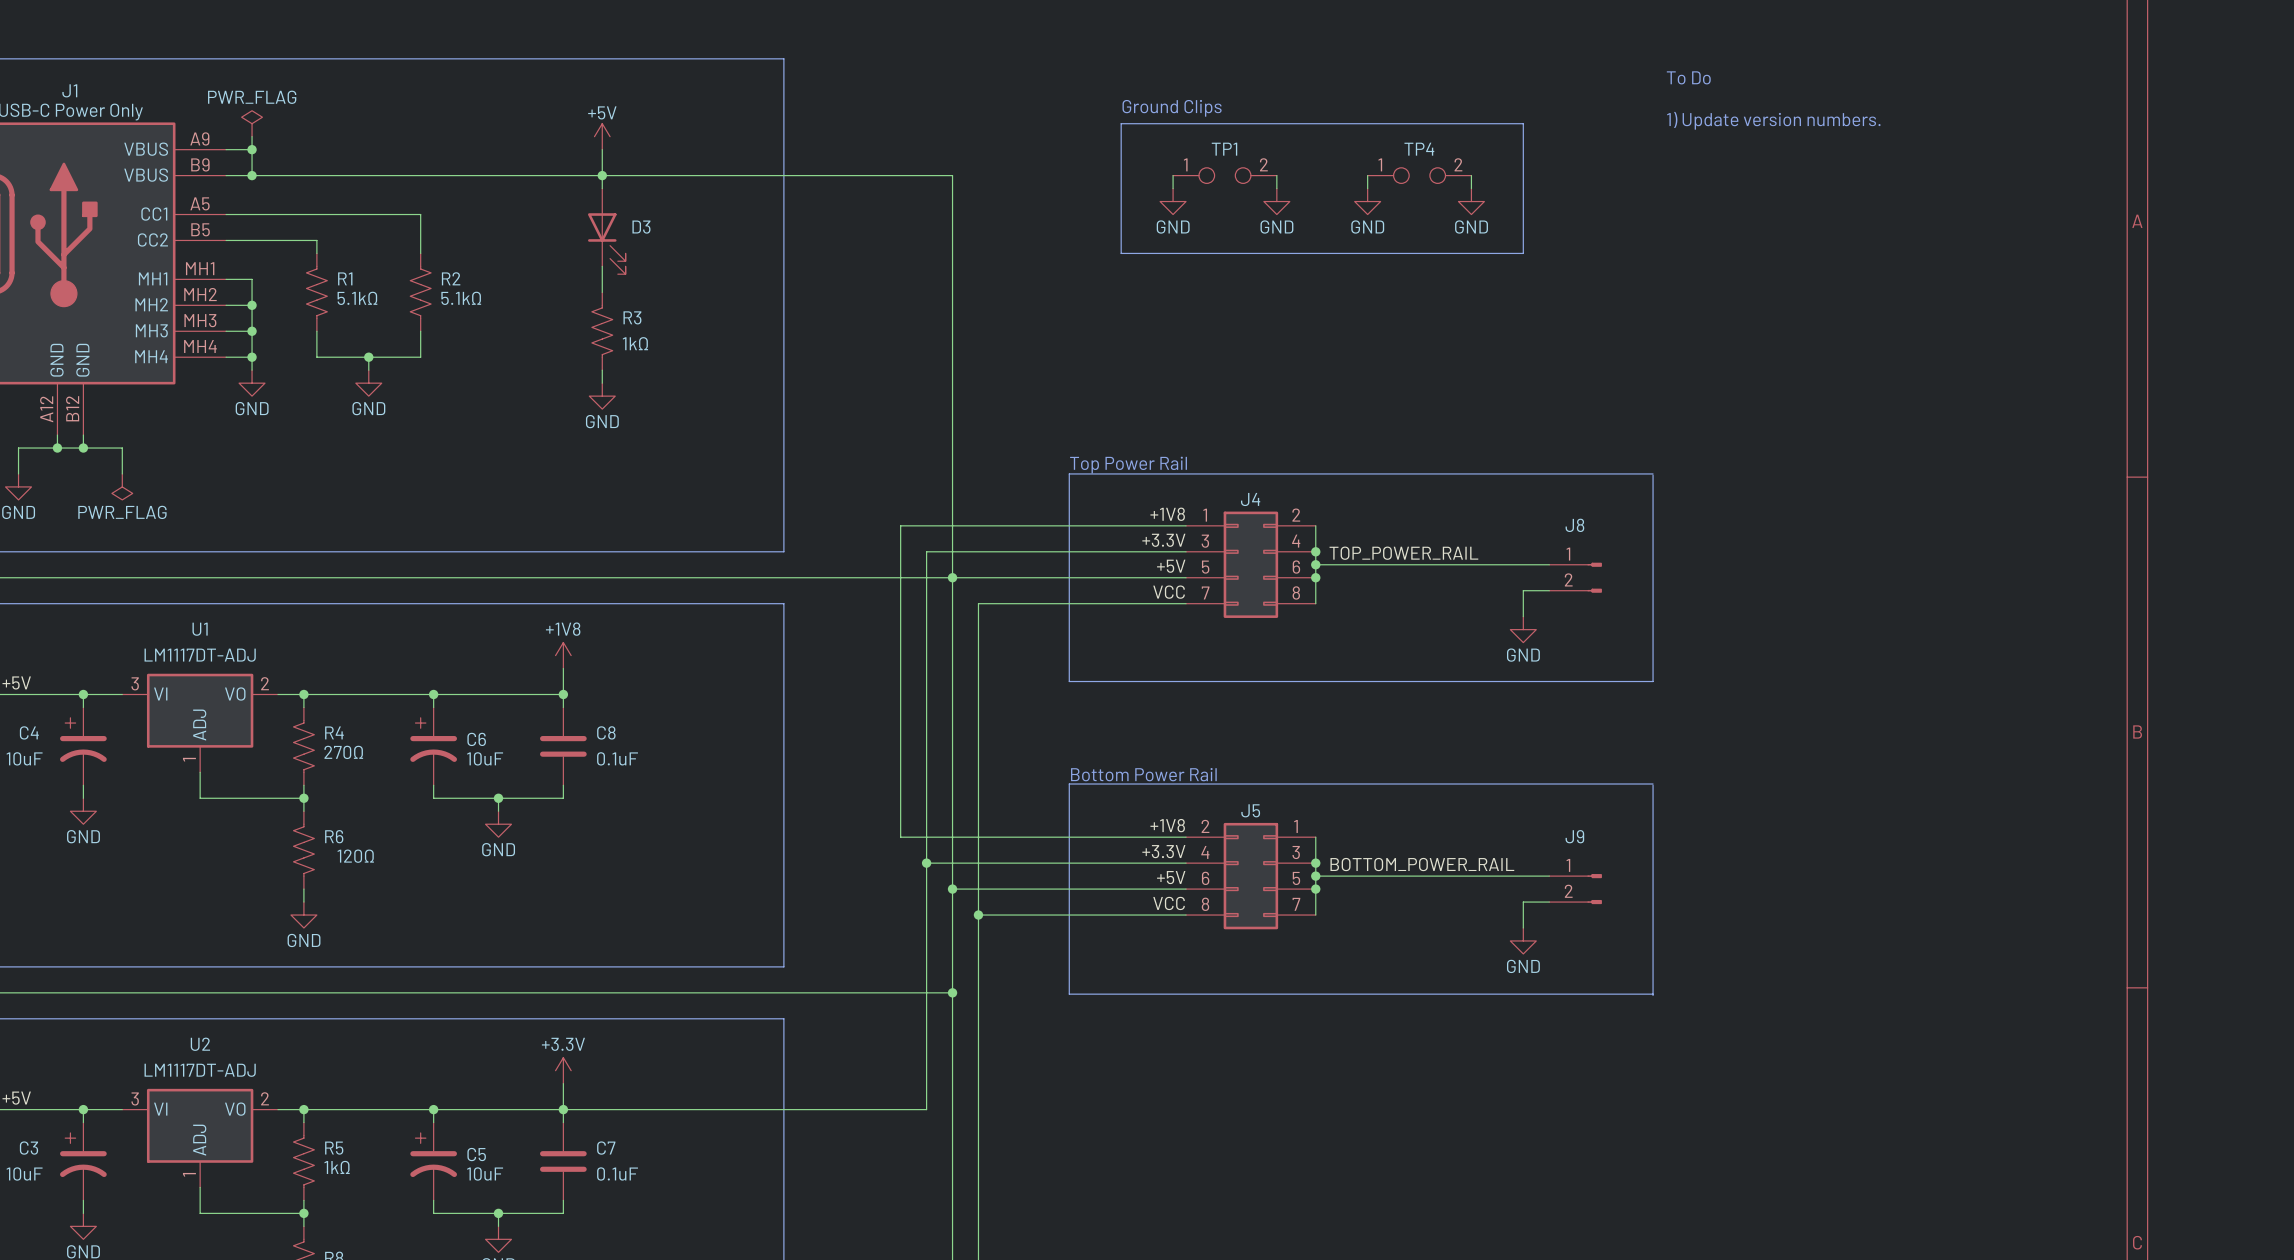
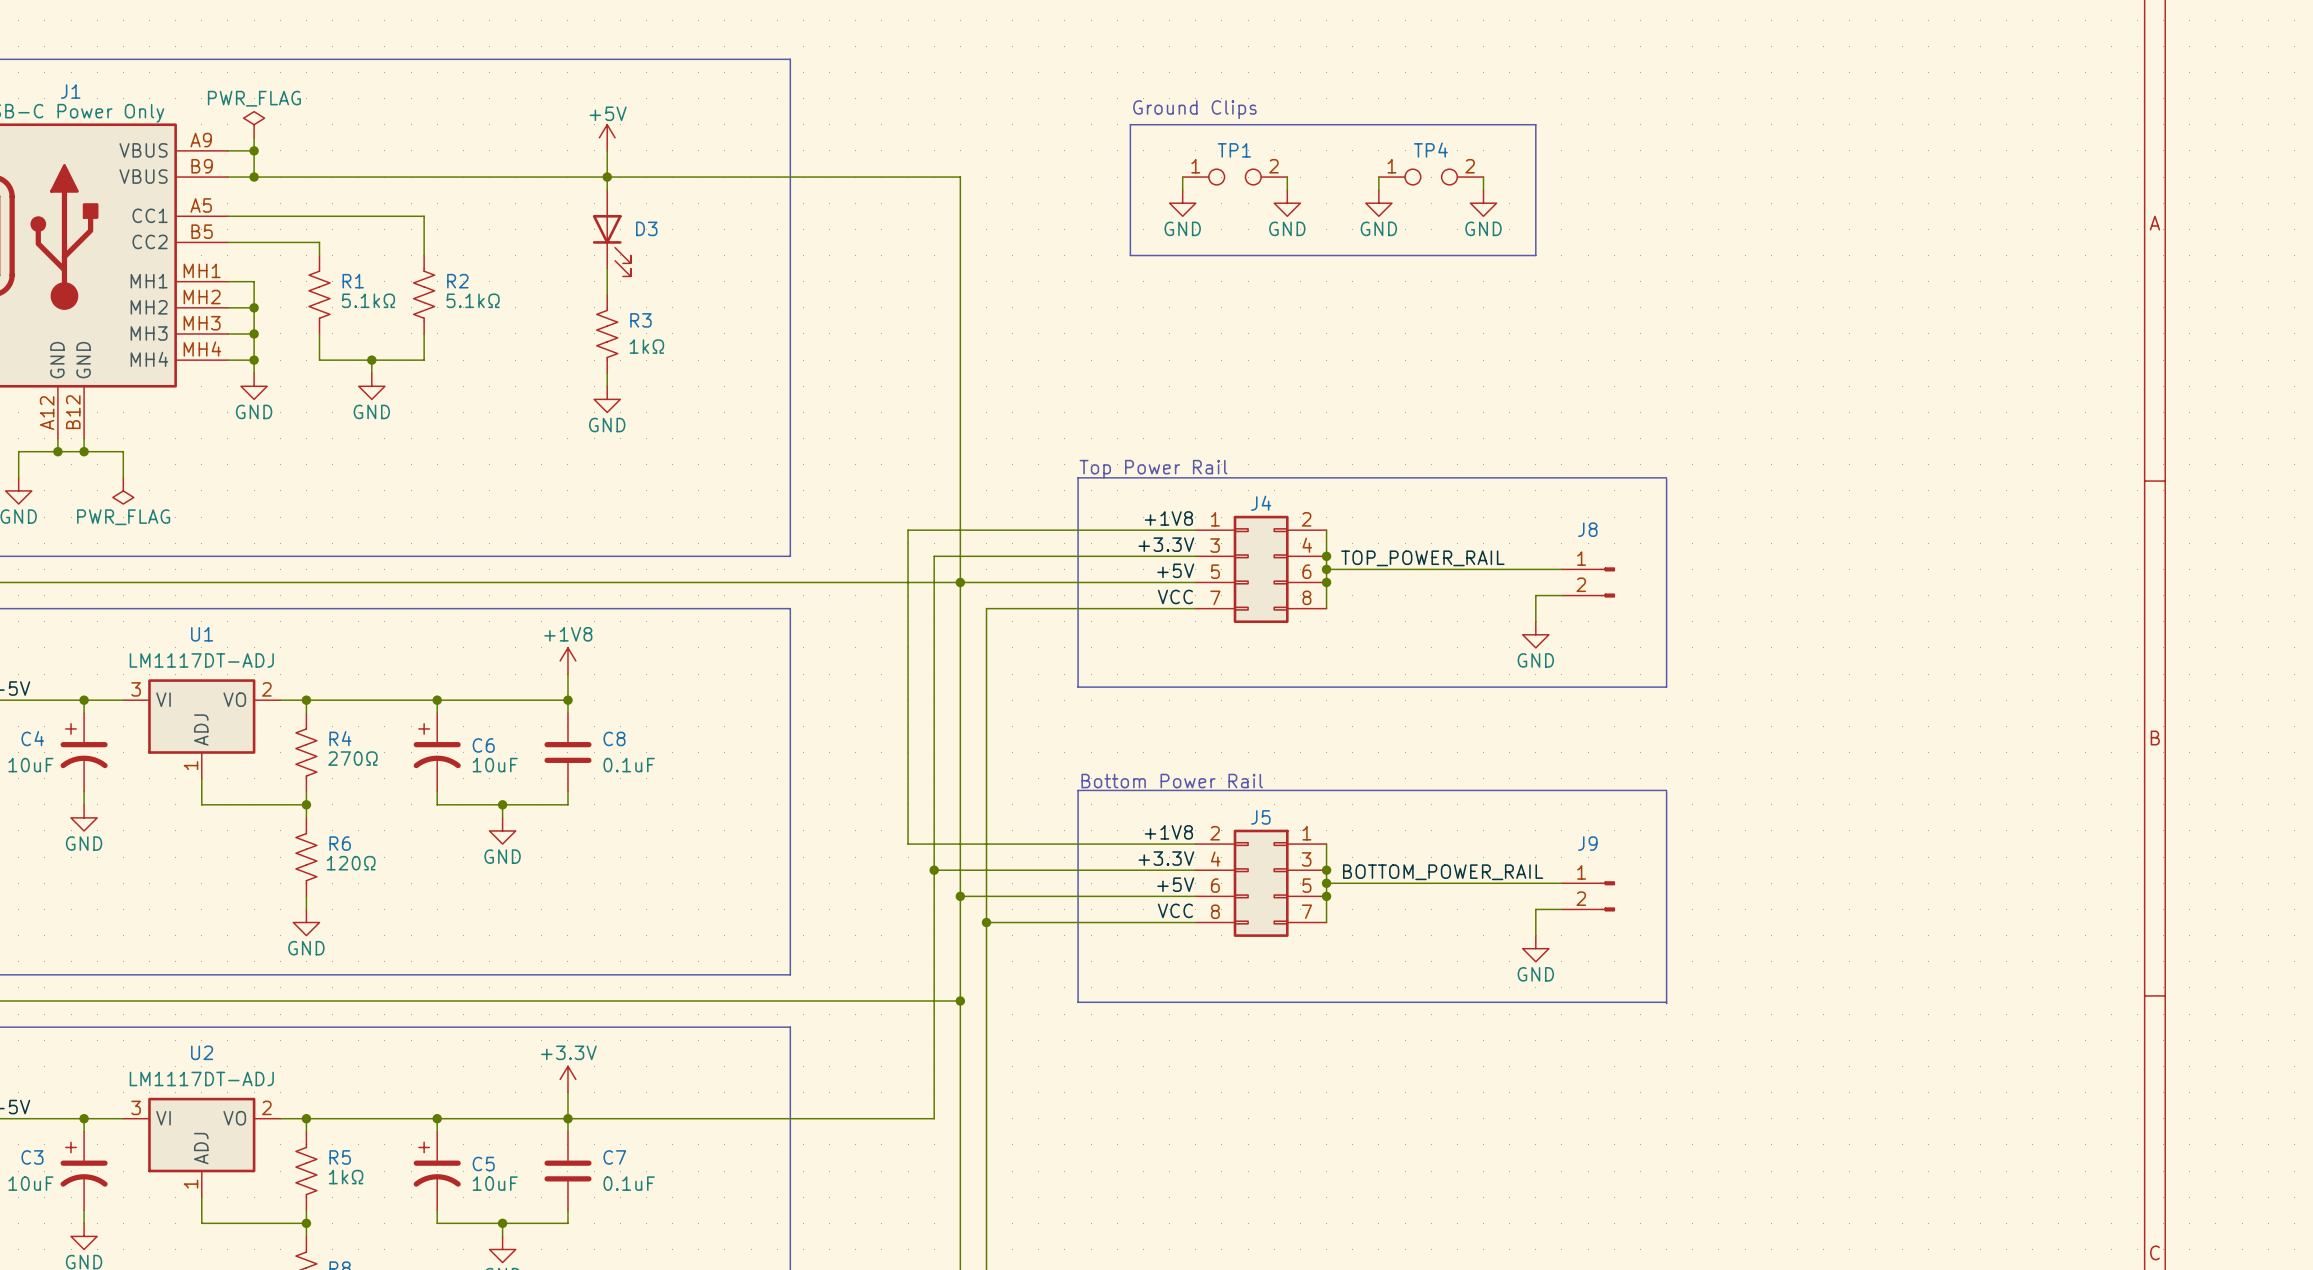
text: To Do (1688, 77) -> none
text: 1) Update version numbers. (1773, 120) -> none

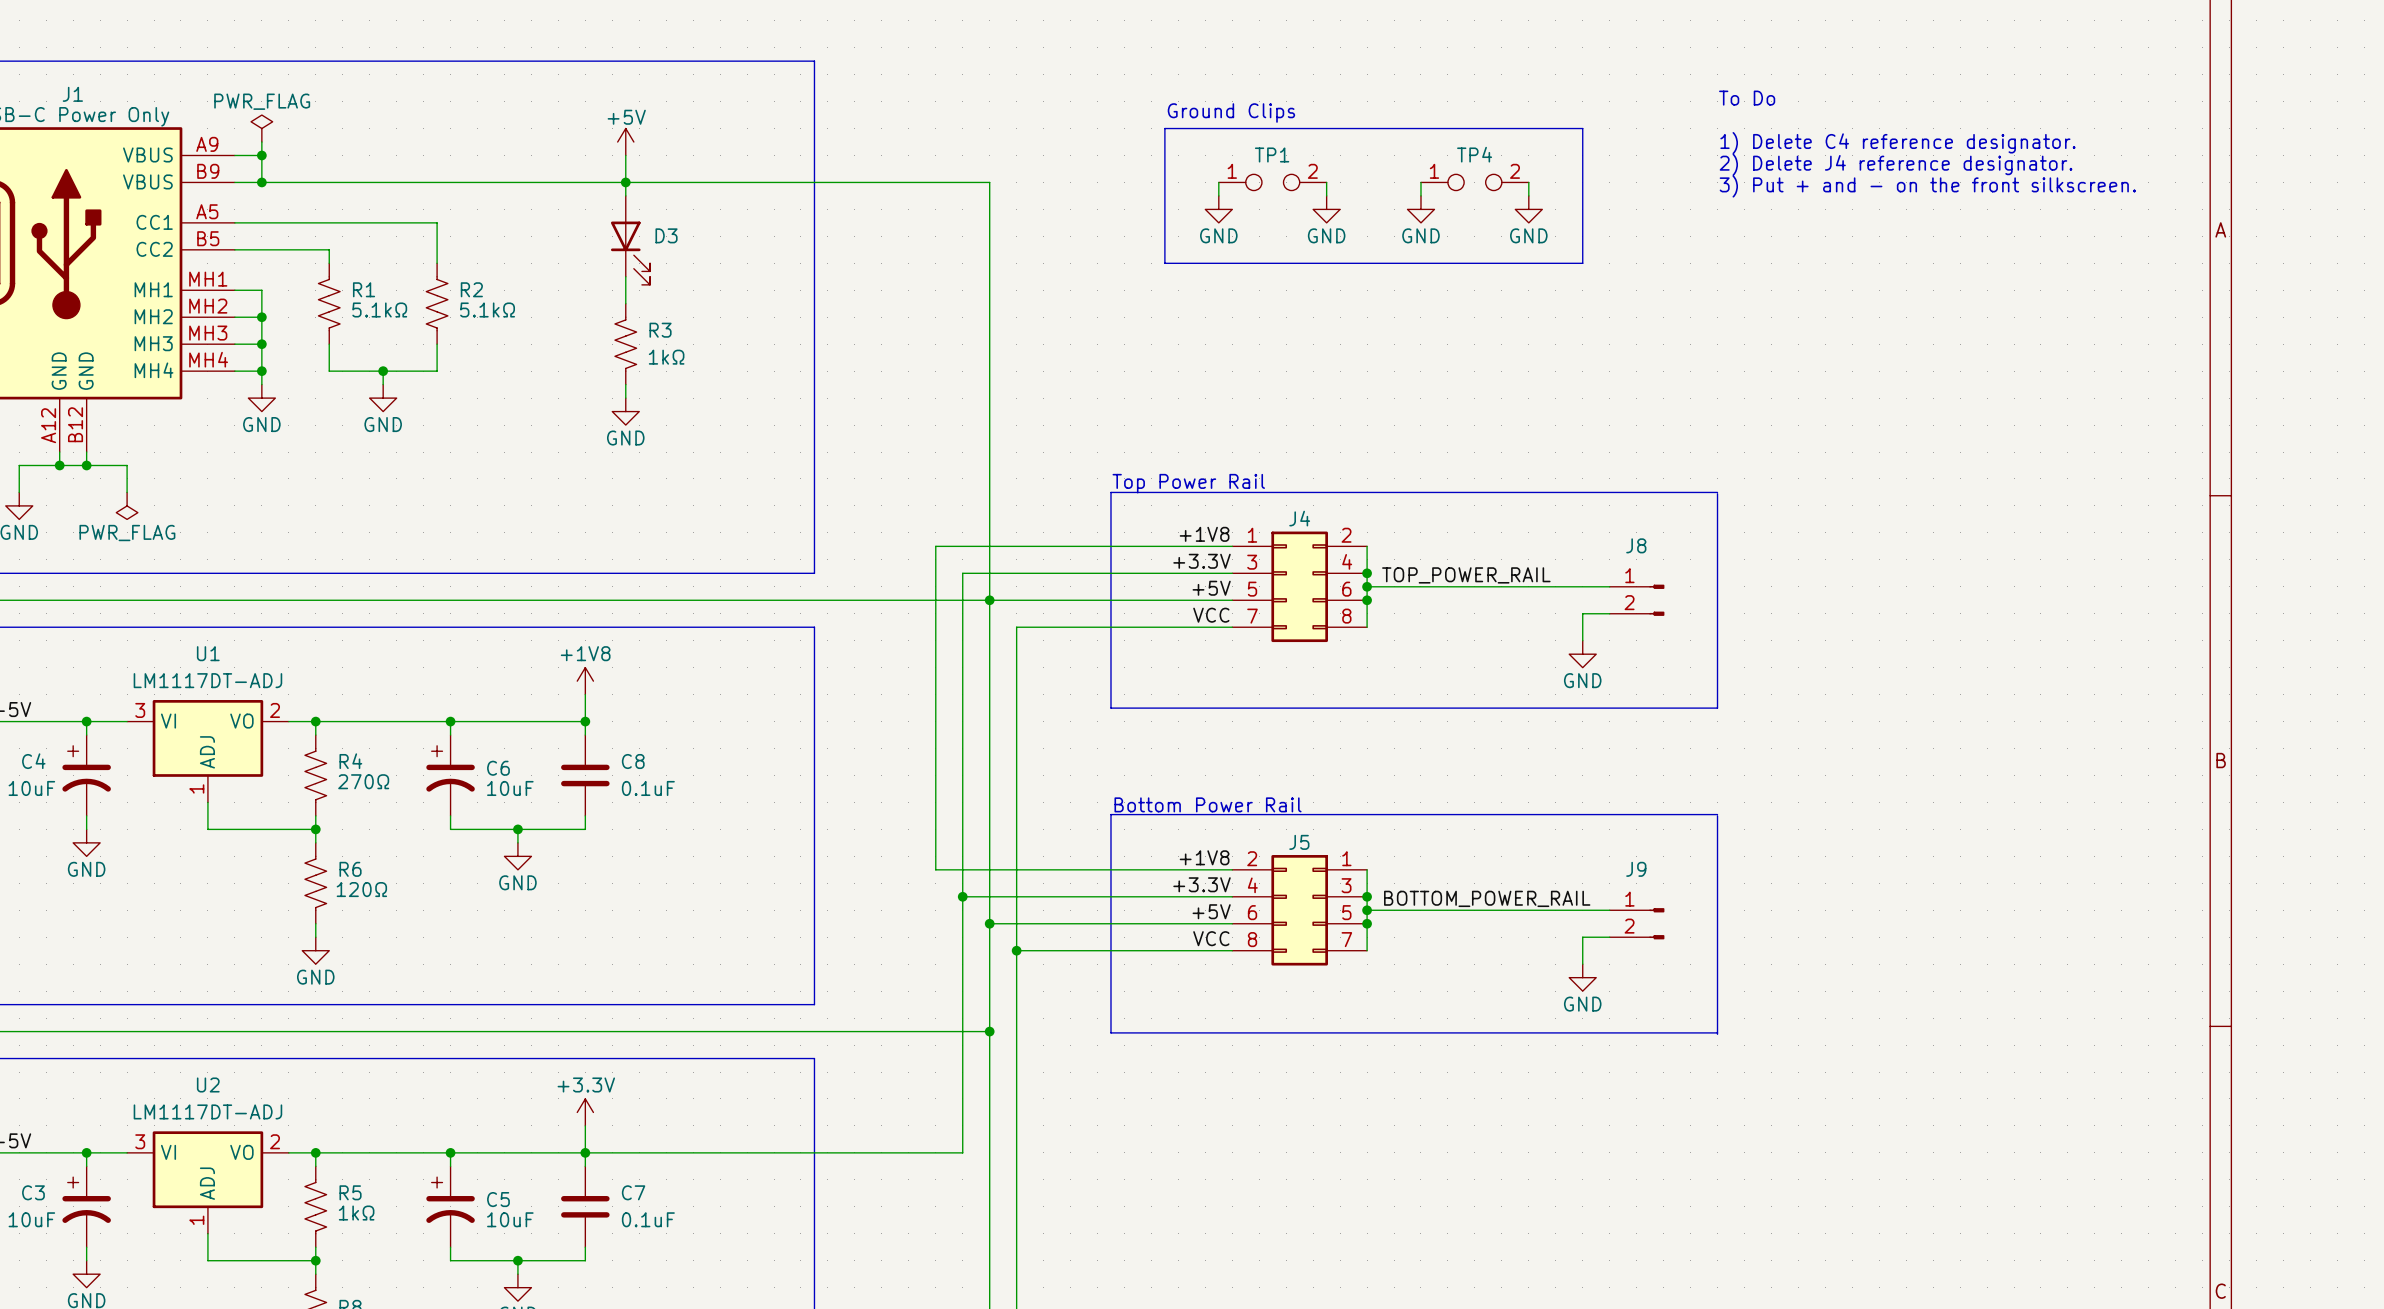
text: none -> To Do (1747, 98)
text: none -> 1) Delete C4 reference designator. (1897, 143)
text: none -> 2) Delete J4 reference designator. (1896, 164)
text: none -> 3) Put + and - on the front silkscreen. (1927, 186)

